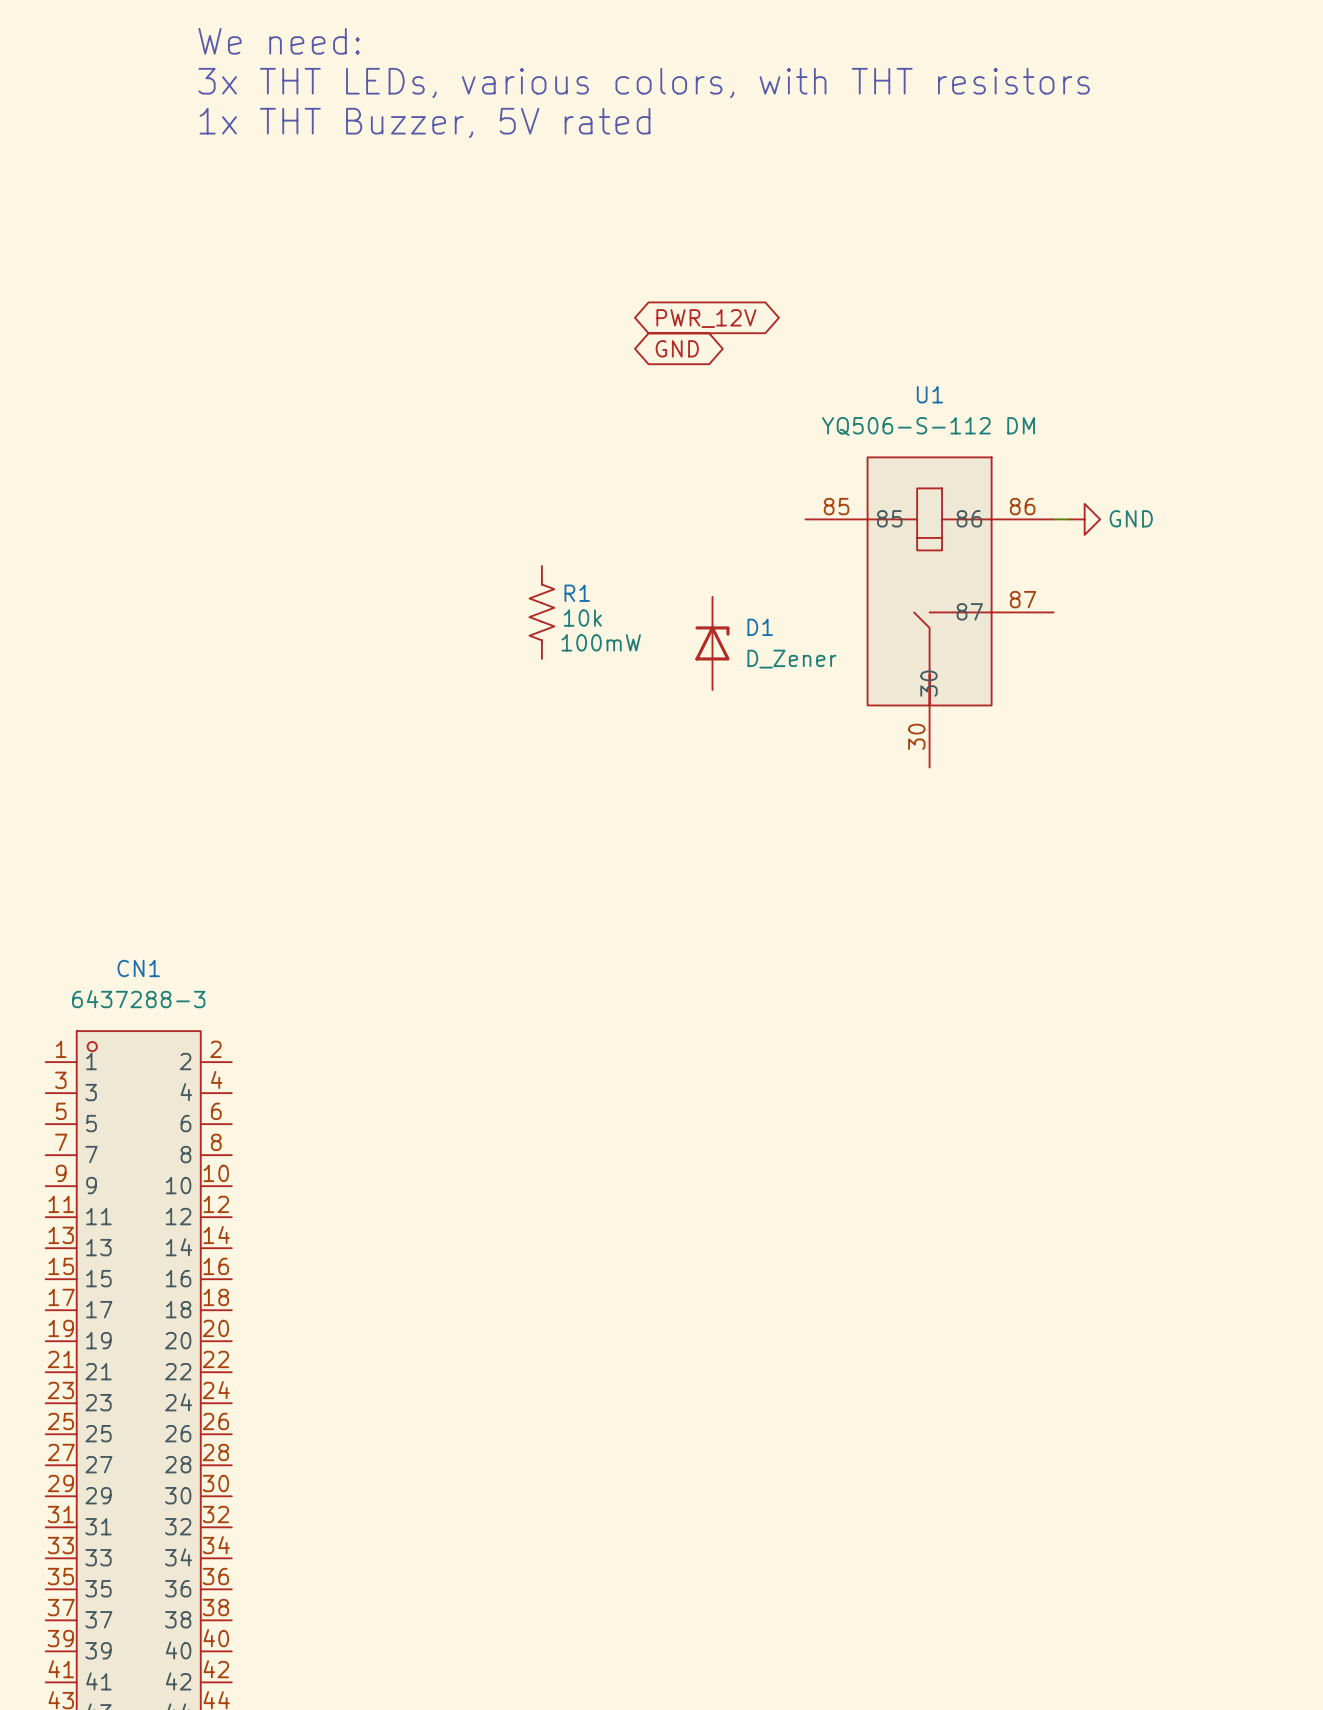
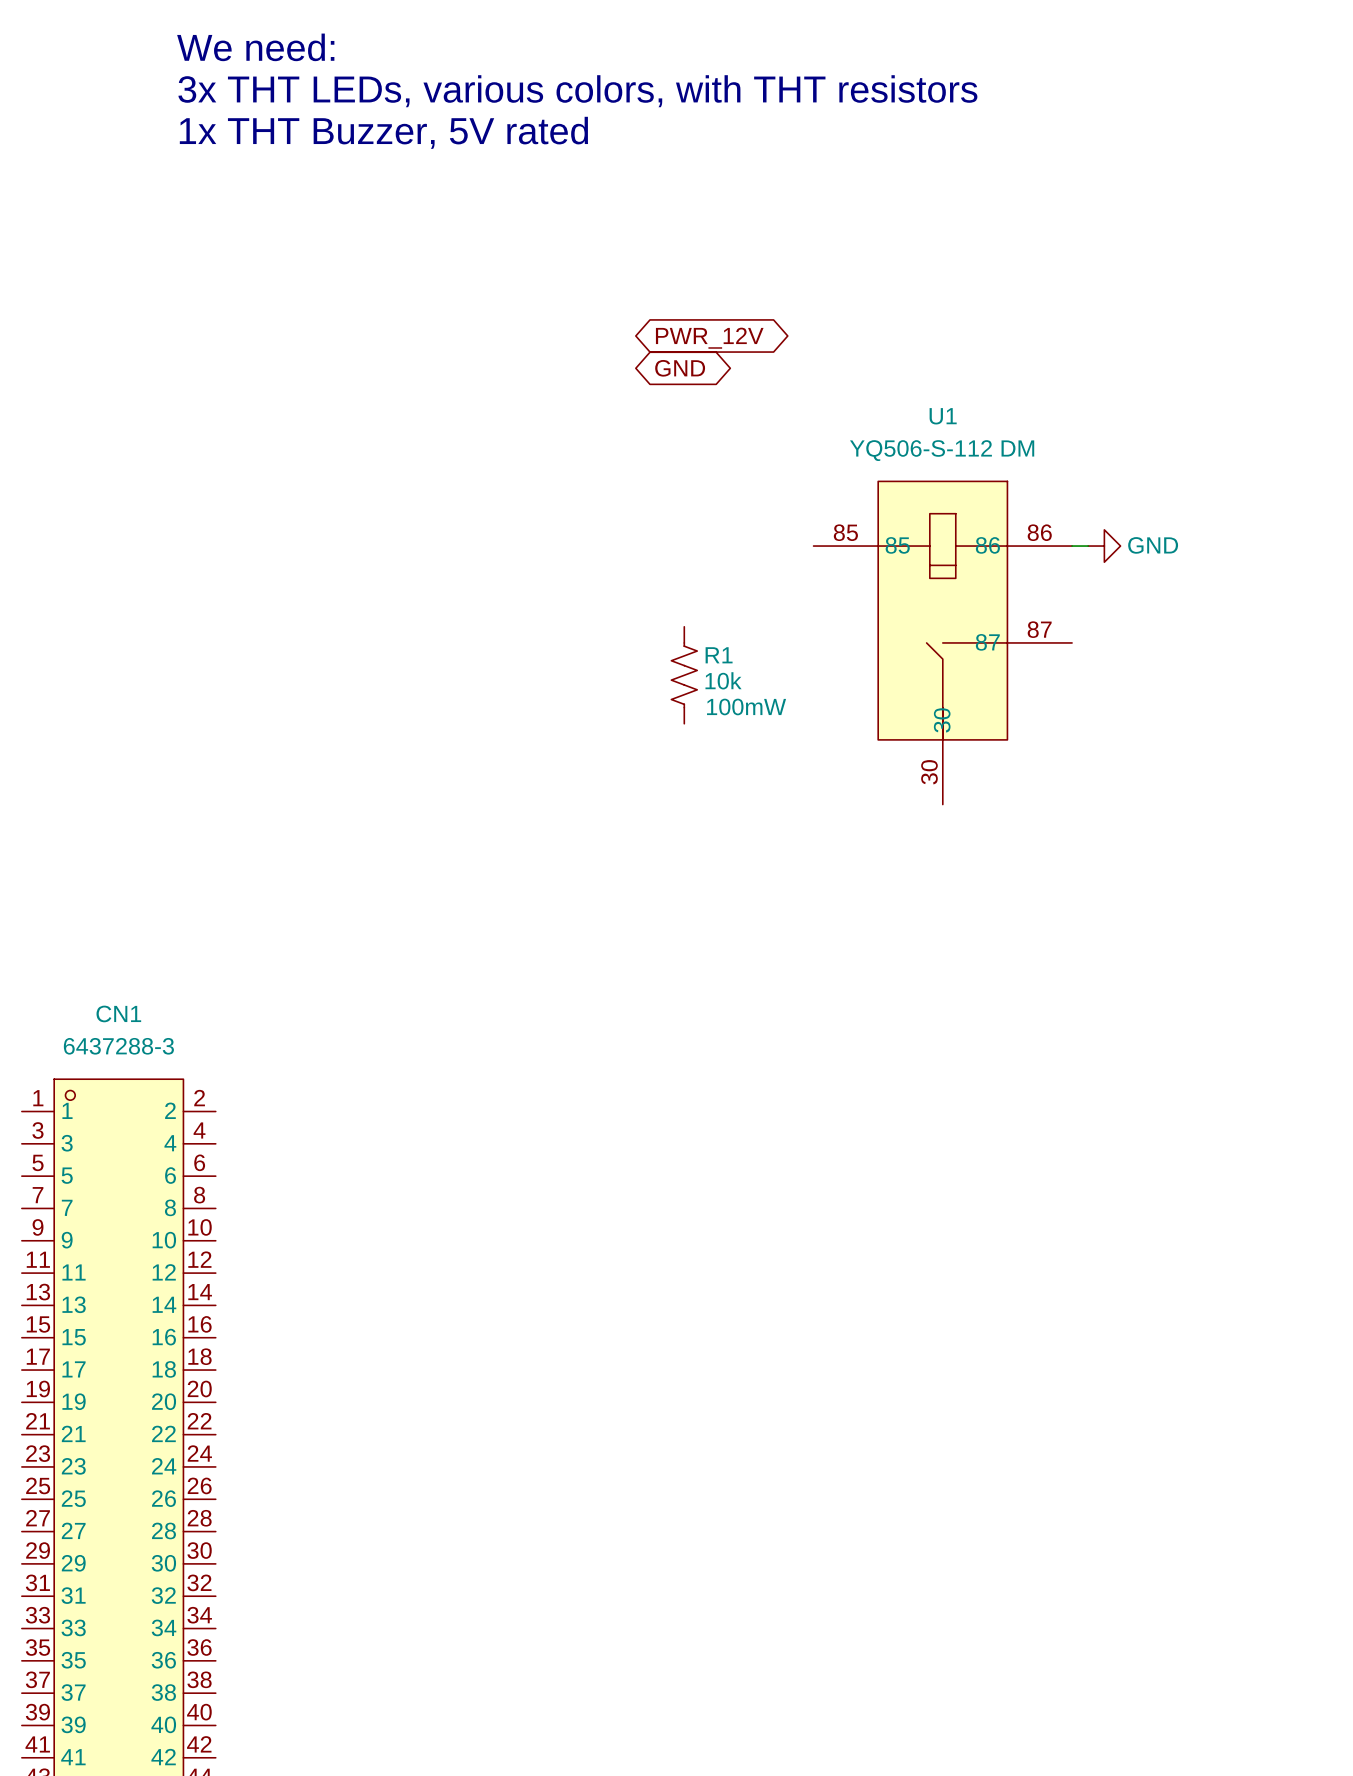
R1 position: (541, 612) -> (684, 675)
D1: D_Zener (712, 643) -> none

